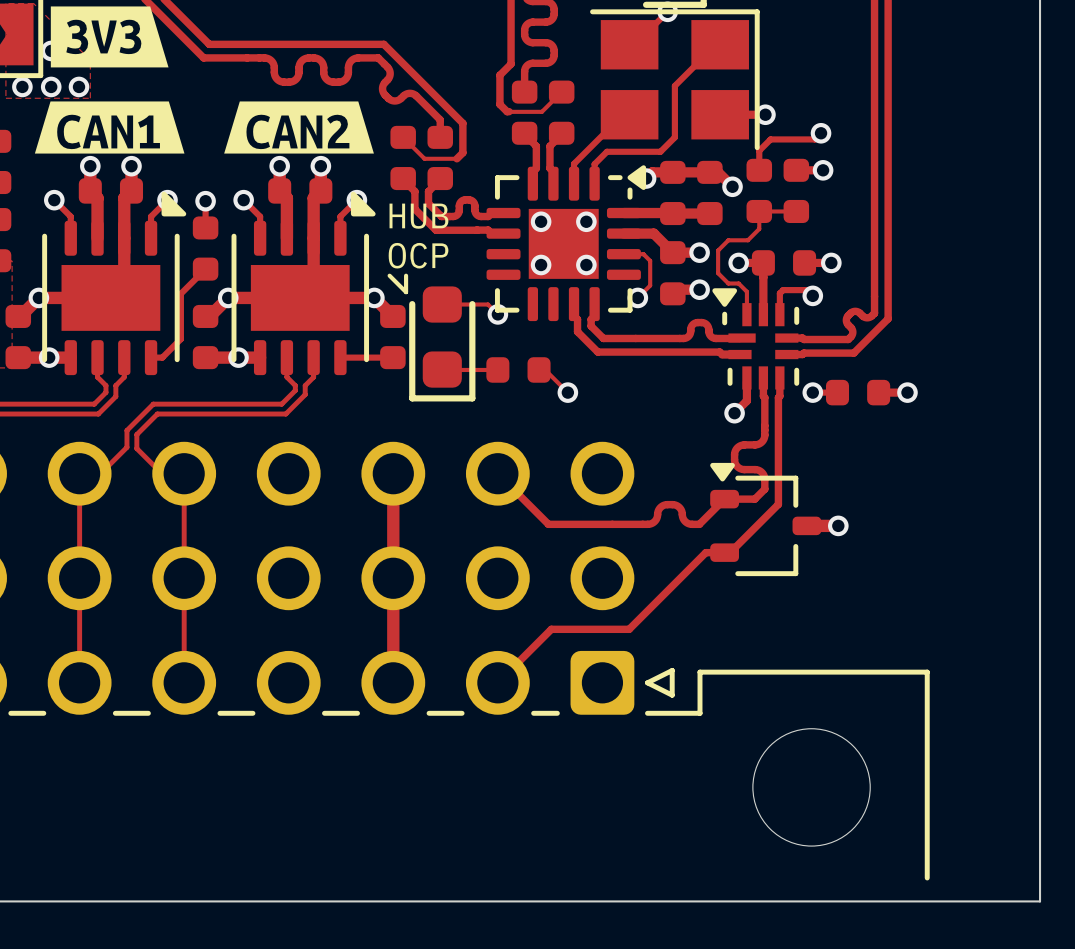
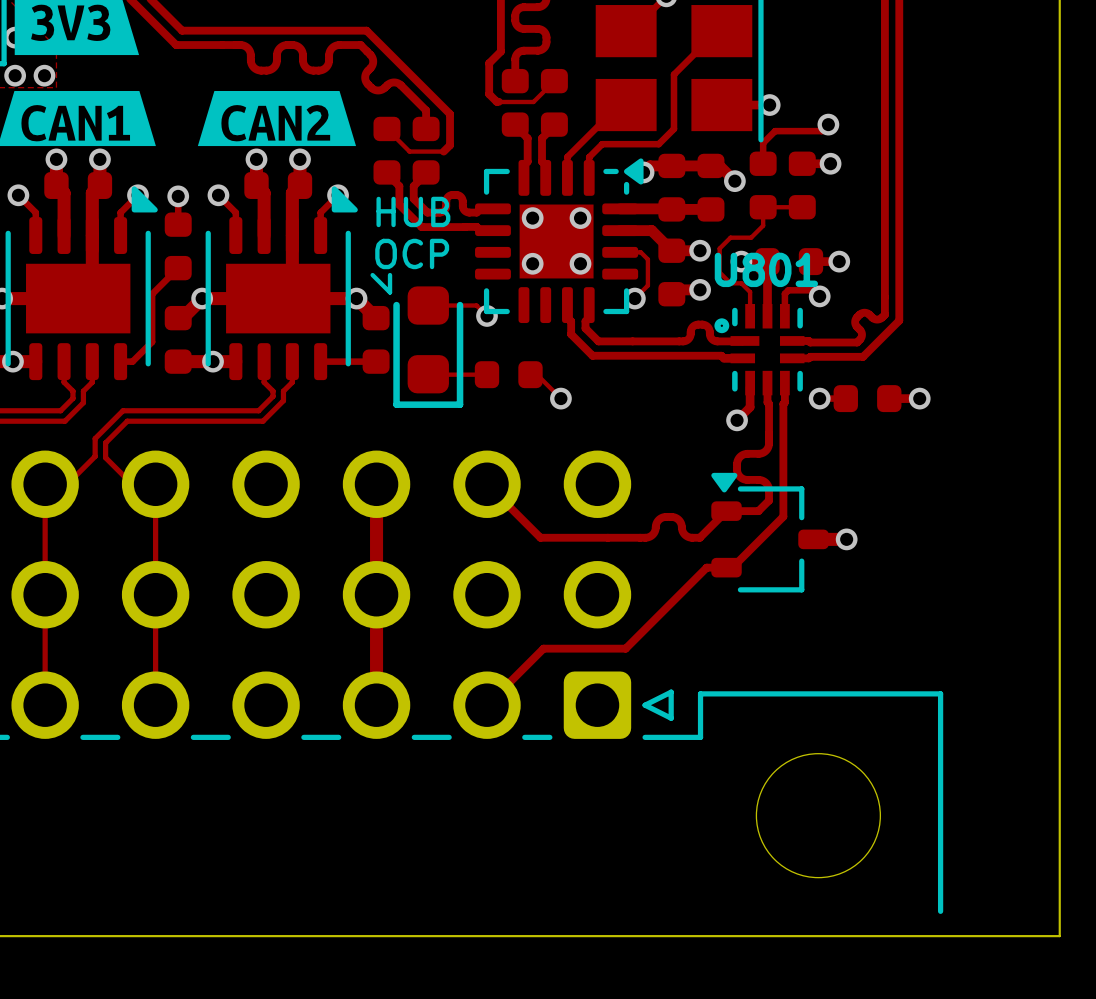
part: (755, 338) -> none
U801: none -> (759, 349)

